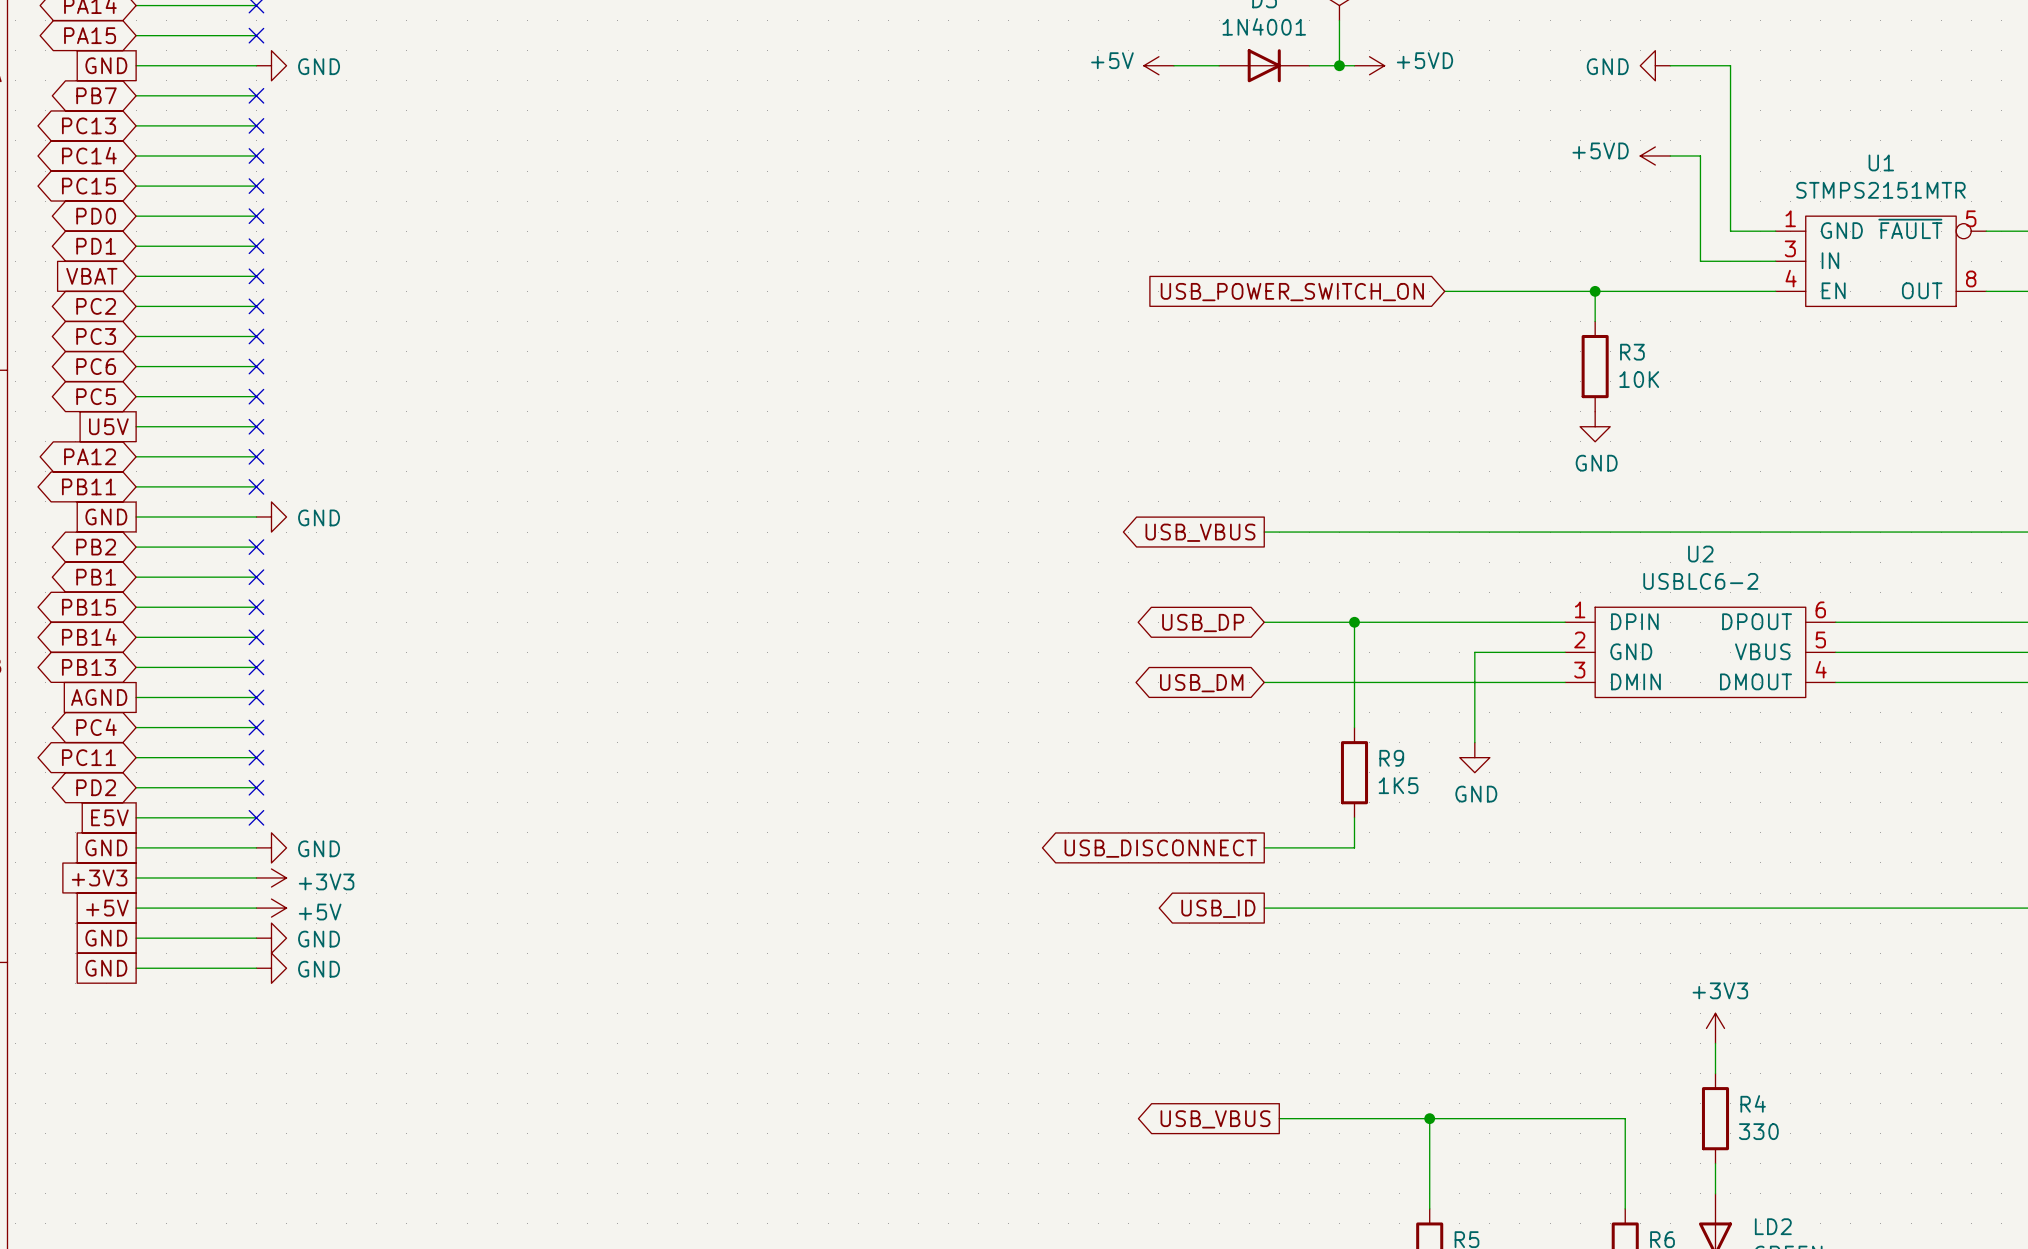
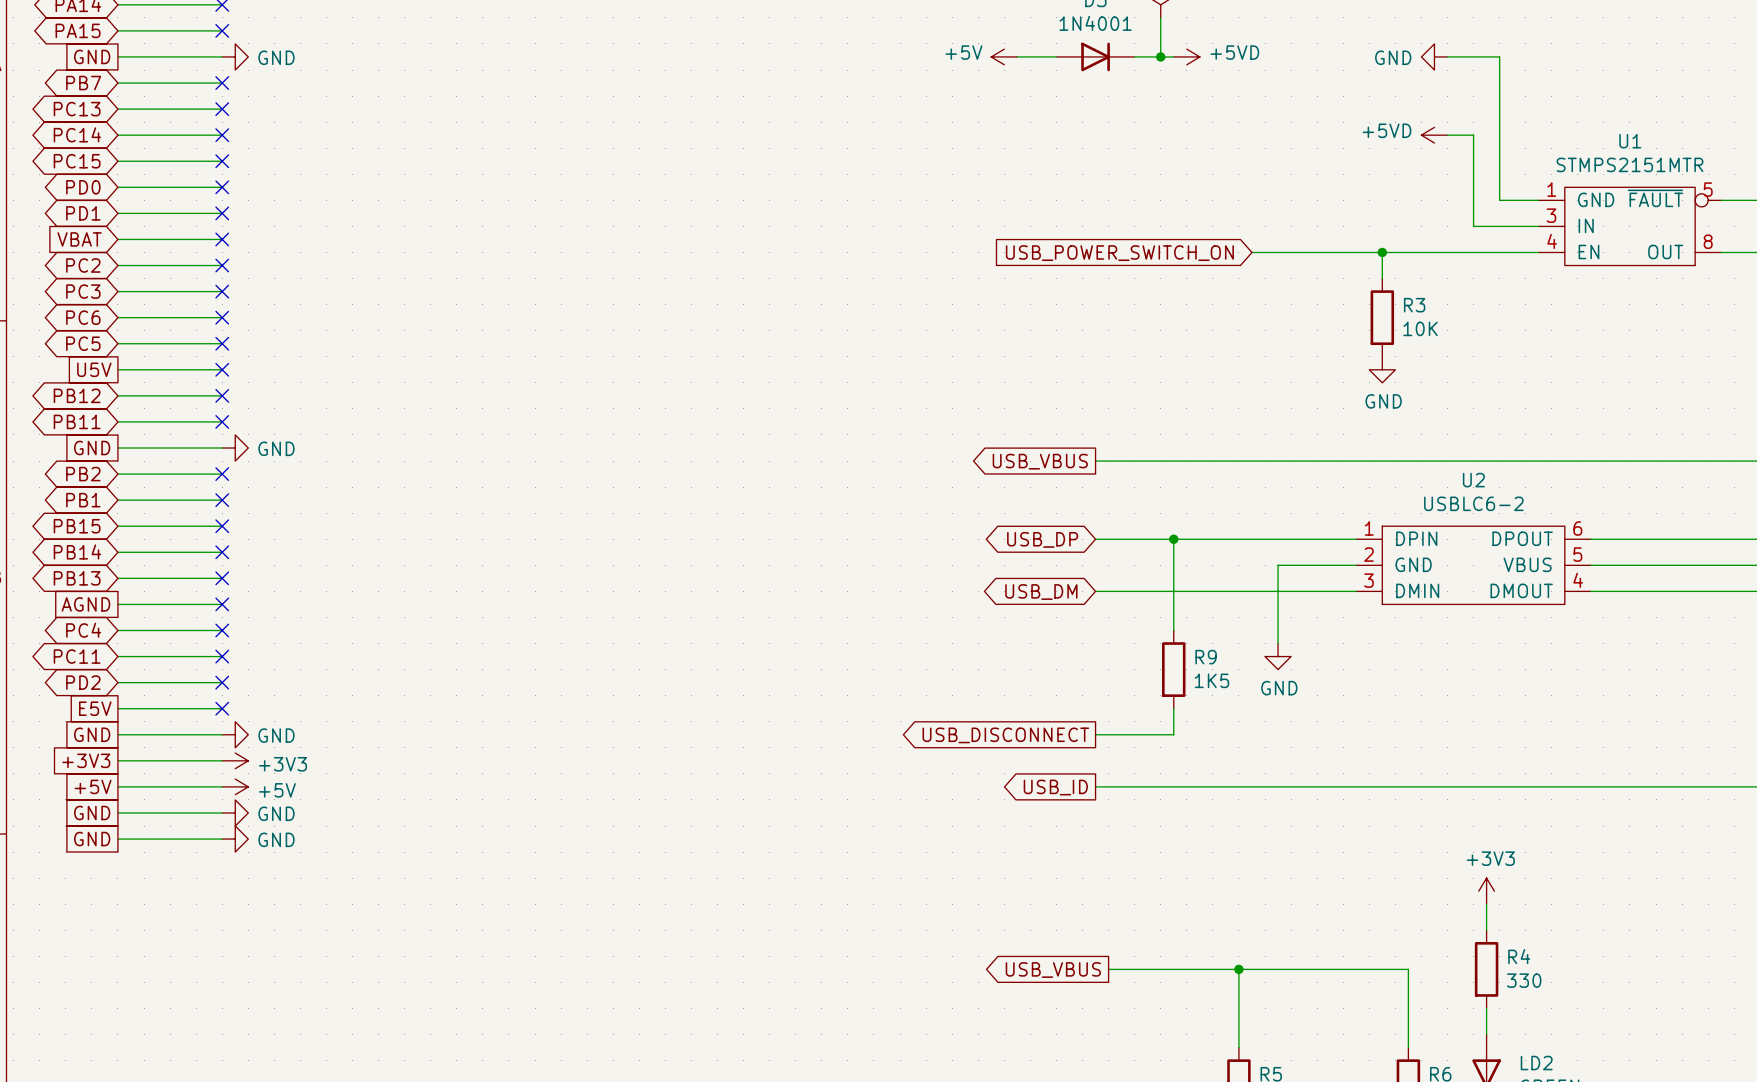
global label: PA12 (90, 456) -> PB12 (77, 395)

